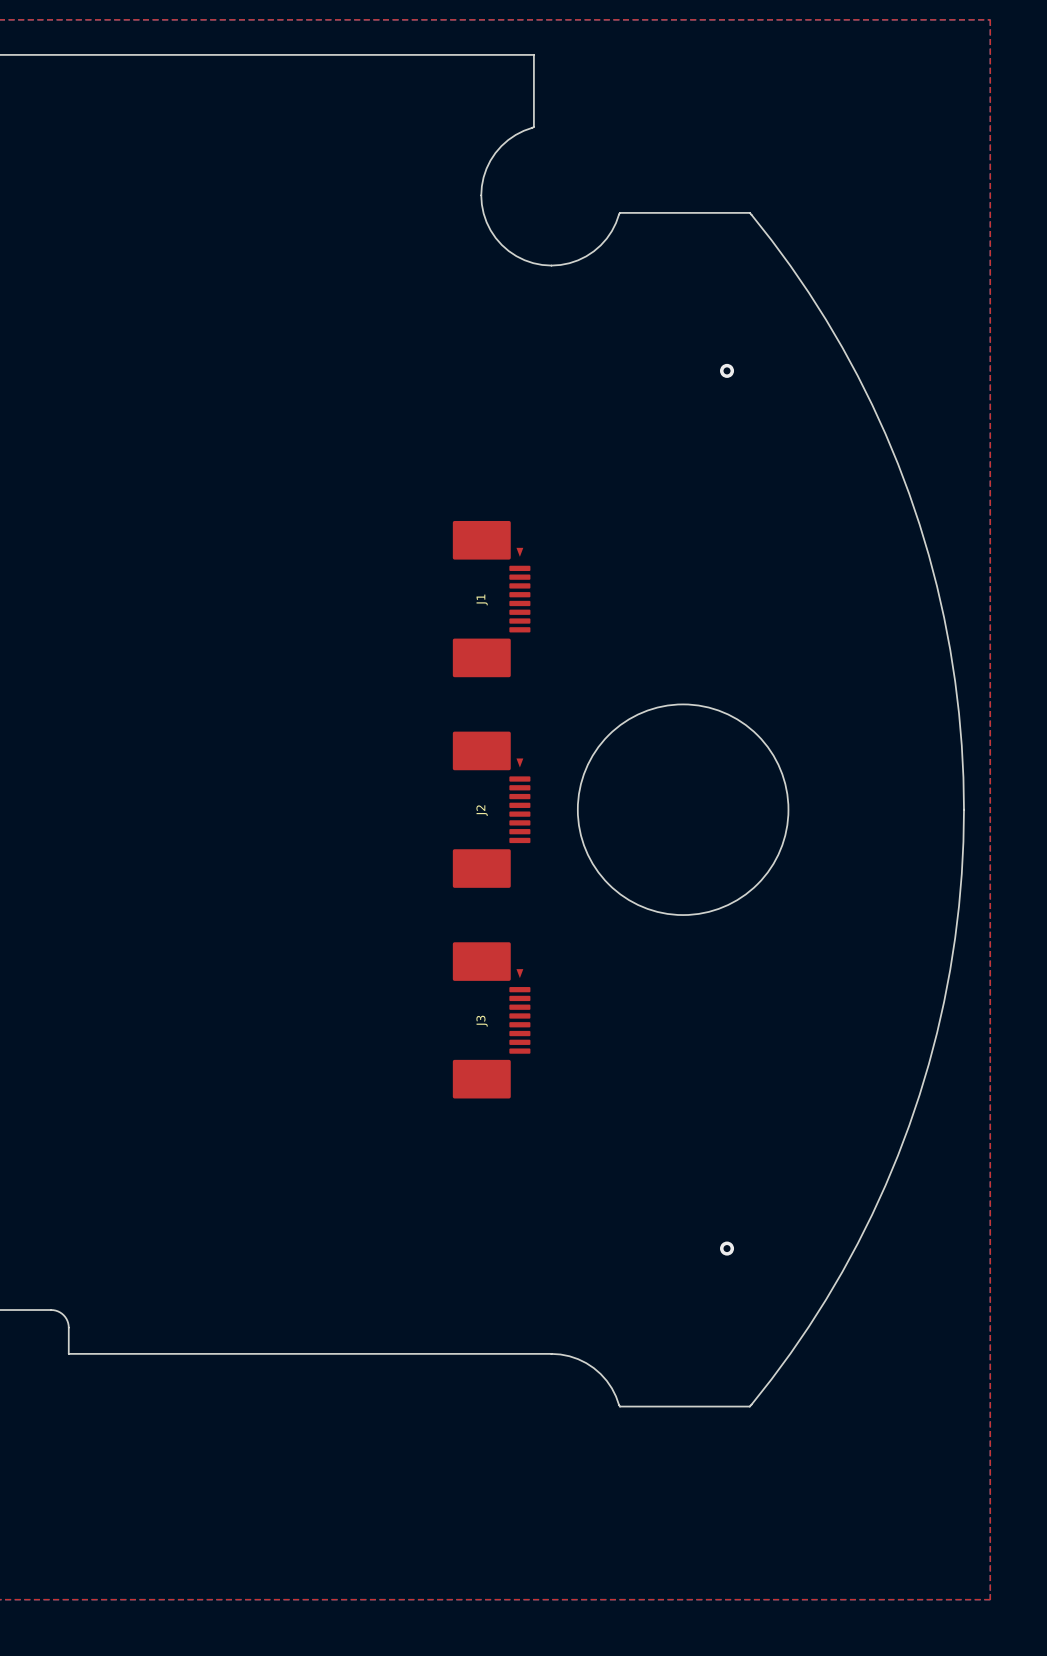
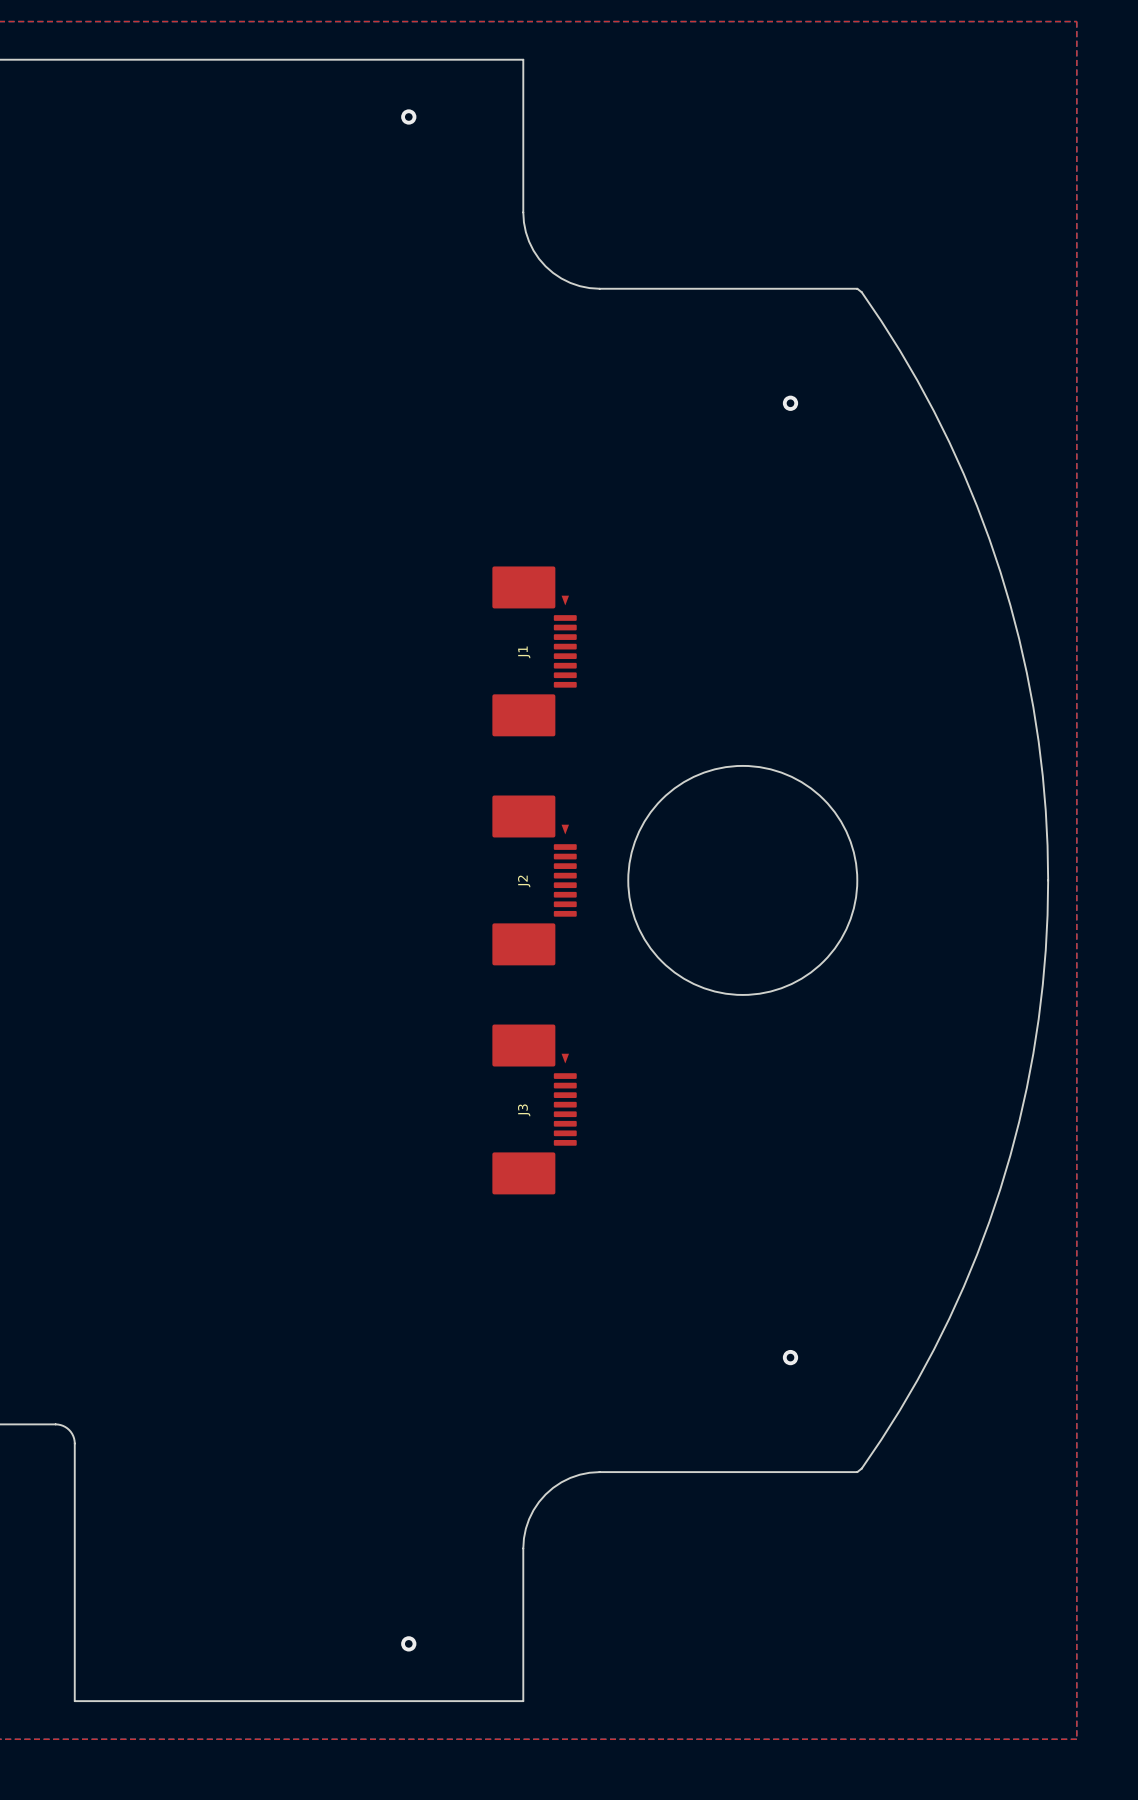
board edge: (481, 54) (533, 54) (533, 126) (515, 134) (495, 152) (486, 168) (481, 195) -> (523, 59) (523, 212)
via: none -> (408, 116)
board edge: (551, 265) (569, 263) (593, 251) (611, 231) (619, 212) (749, 212) (790, 265) (842, 347) (885, 433) (909, 493) (928, 555) (950, 649) (961, 745) (963, 841) (955, 938) (937, 1033) (909, 1125) (885, 1185) (857, 1243) (826, 1299) (790, 1353) (749, 1406) (619, 1406) (611, 1388) (600, 1374) (578, 1359) (560, 1354) (68, 1353) -> (599, 288) (857, 288) (861, 292) (899, 350) (933, 411) (963, 474) (989, 538) (1019, 638) (1038, 741) (1045, 810) (1047, 915) (1038, 1019) (1026, 1087) (1000, 1188) (963, 1286) (917, 1380) (881, 1439) (857, 1472) (589, 1472) (561, 1482) (545, 1494) (533, 1510) (523, 1538) (523, 1701) (74, 1701) (74, 1472)
via: none -> (408, 1643)

